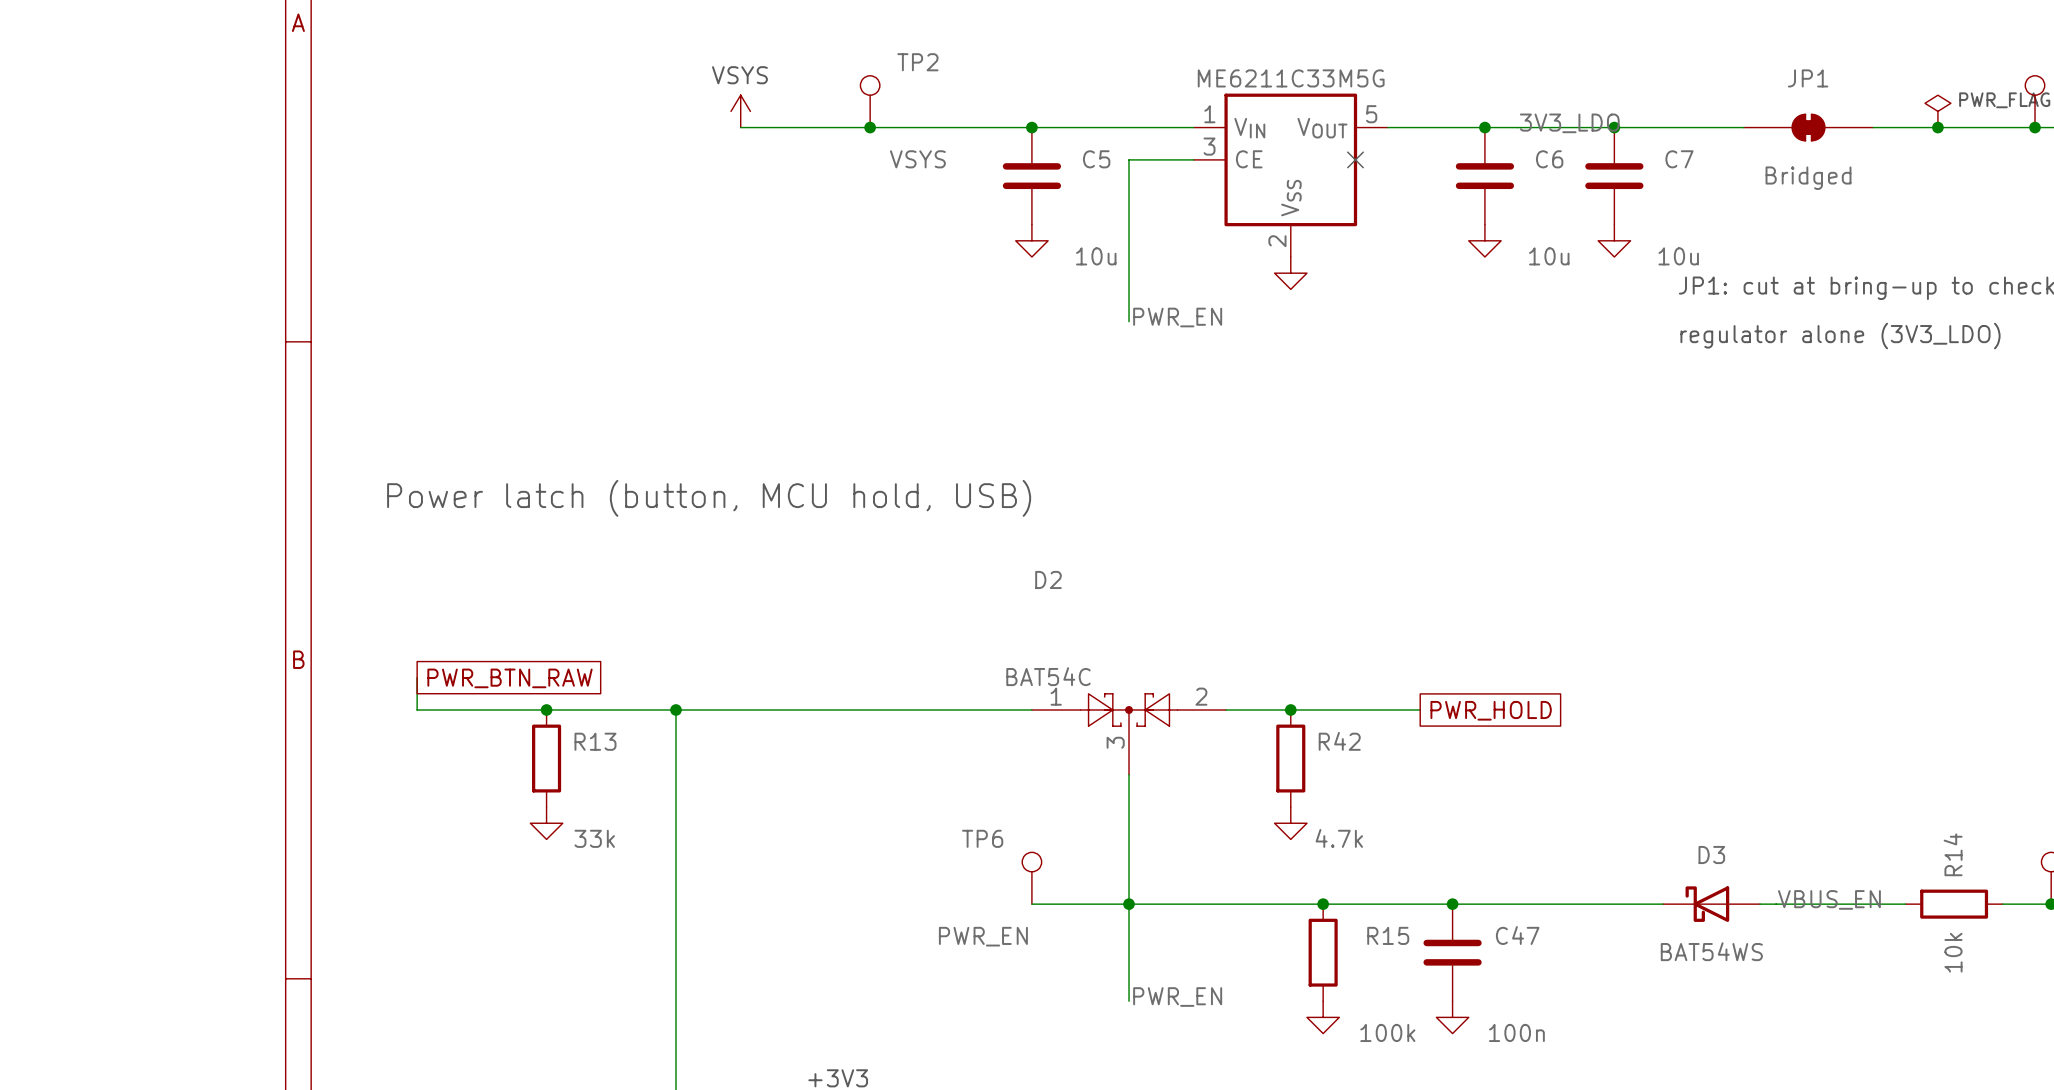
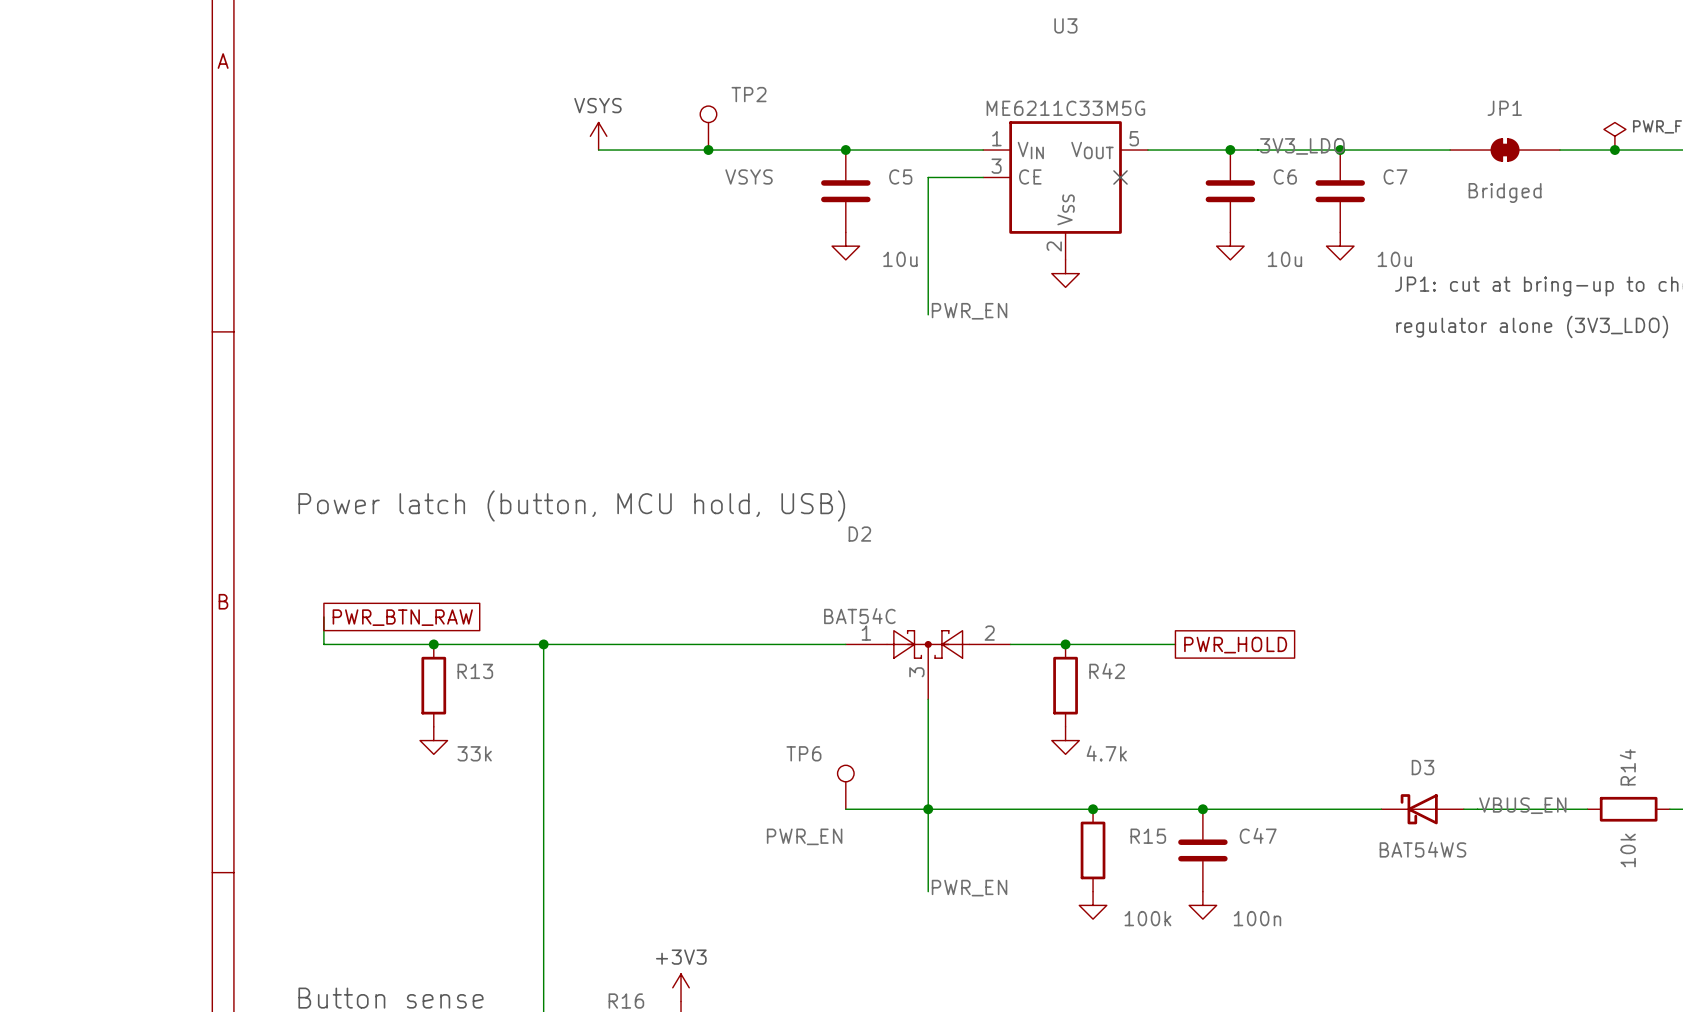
text position: Power latch (button, MCU hold, USB) (709, 498) -> Power latch (button, MCU hold, USB) (571, 505)

